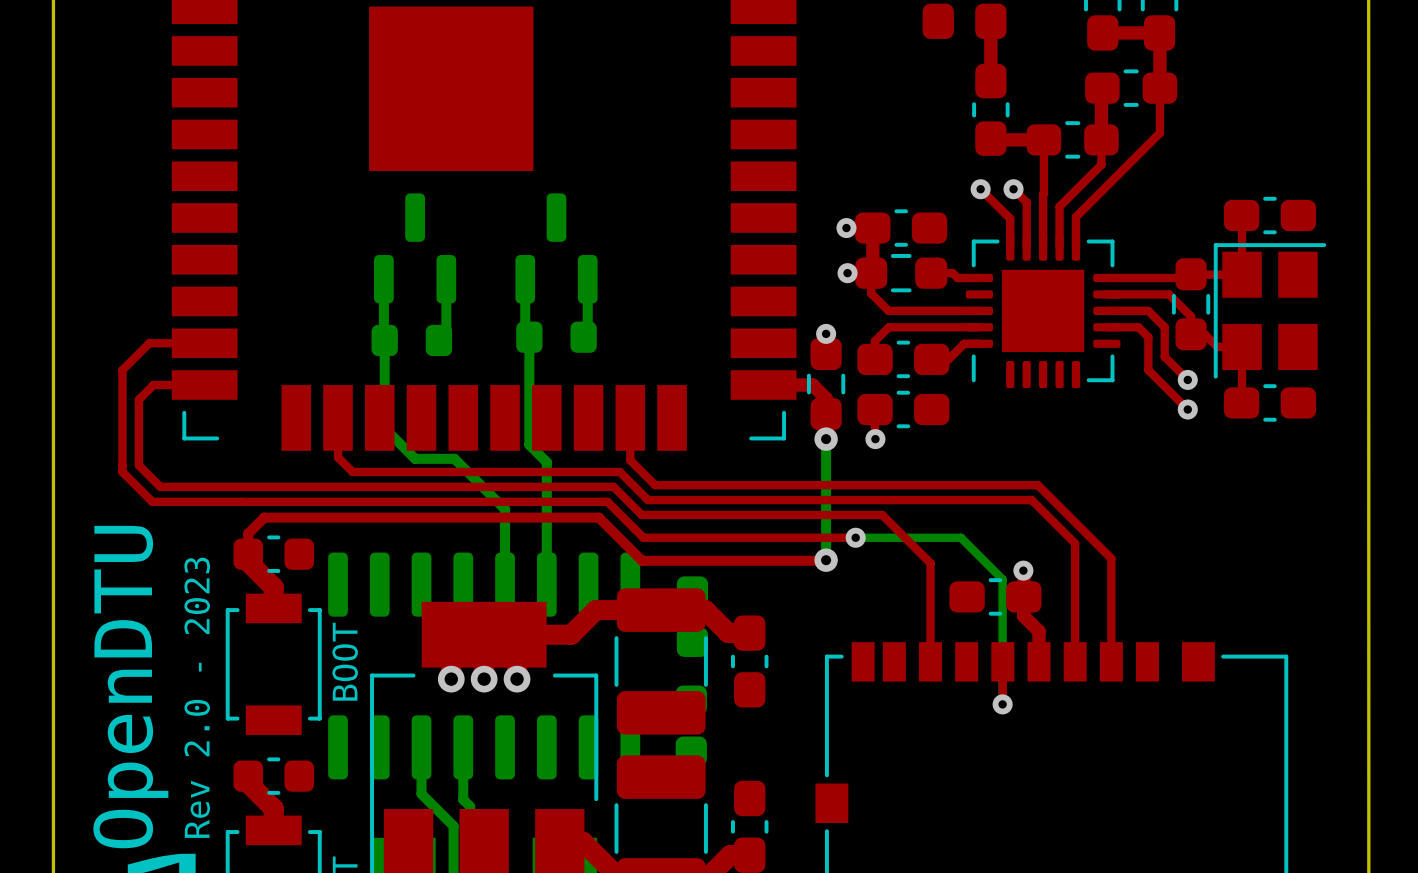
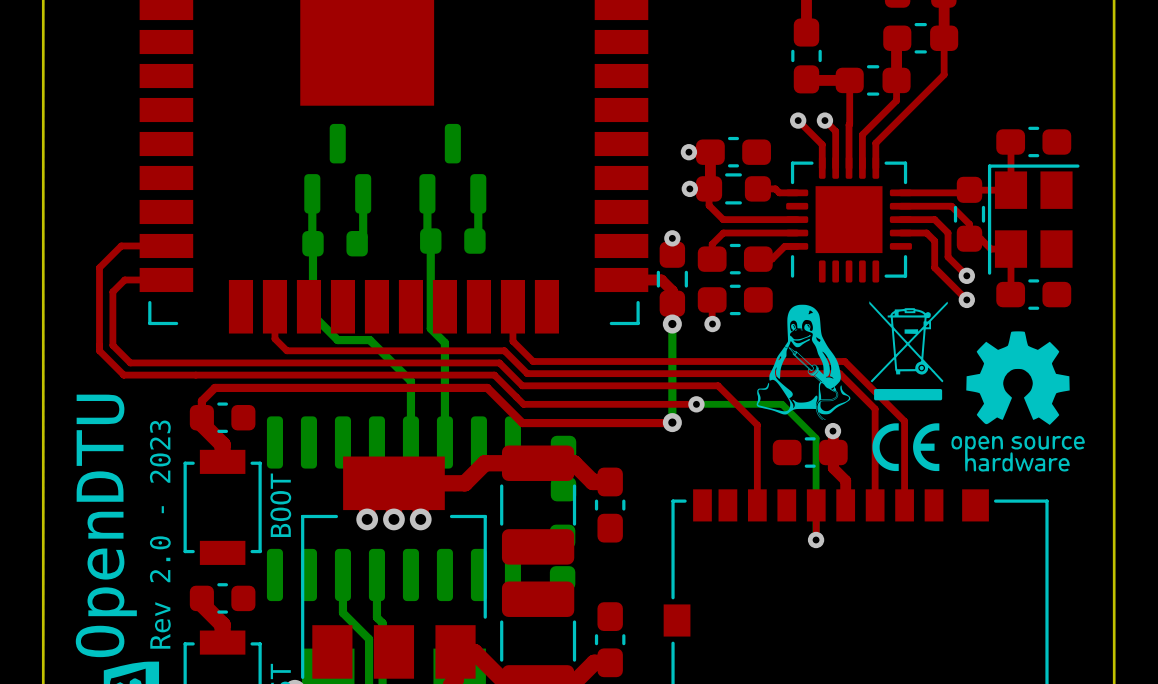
drawing: none -> [756, 301, 1085, 472]

